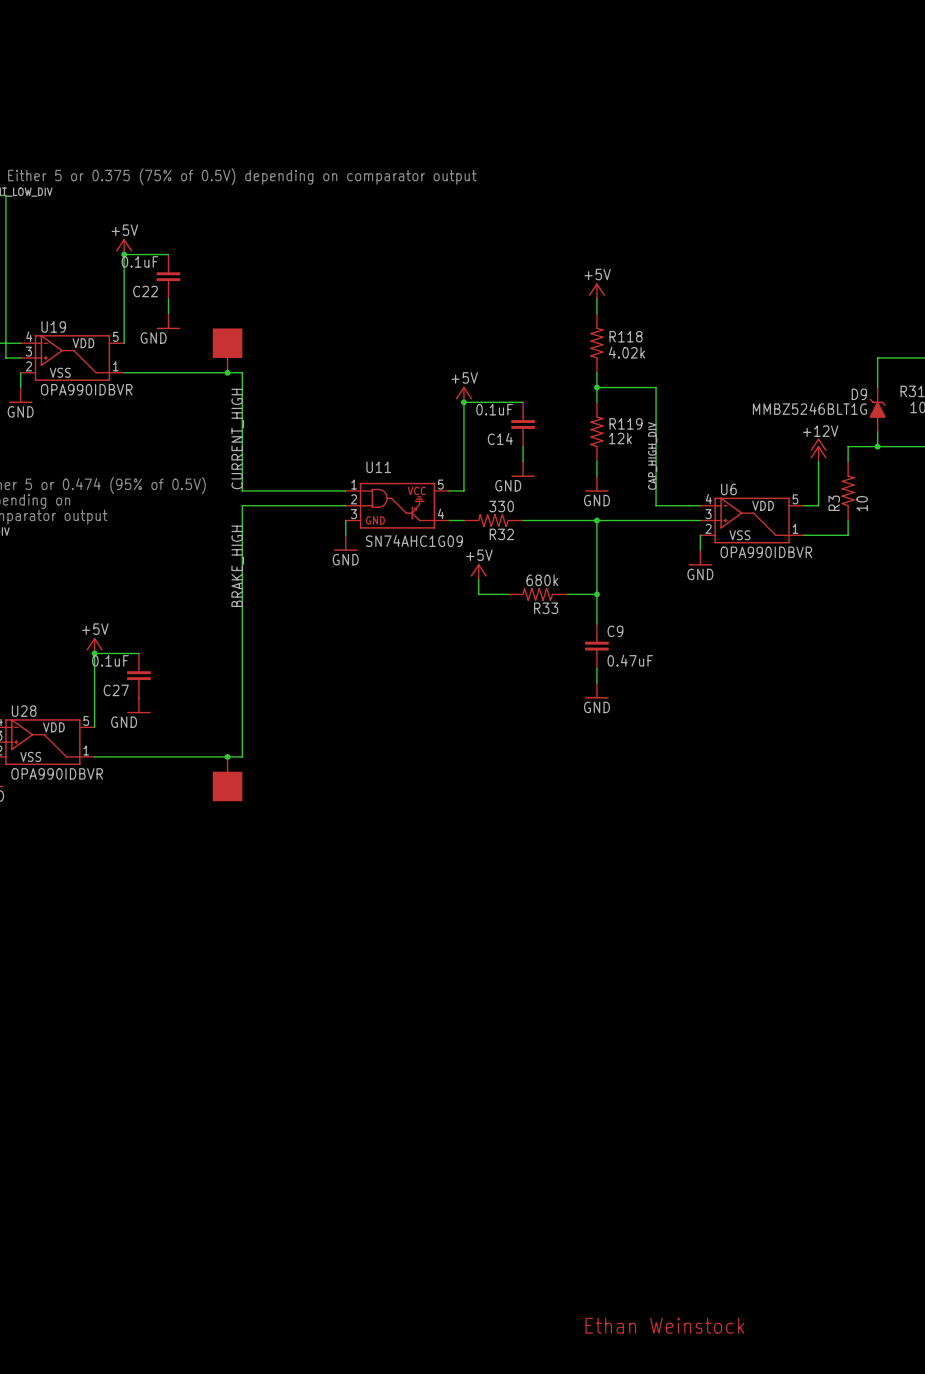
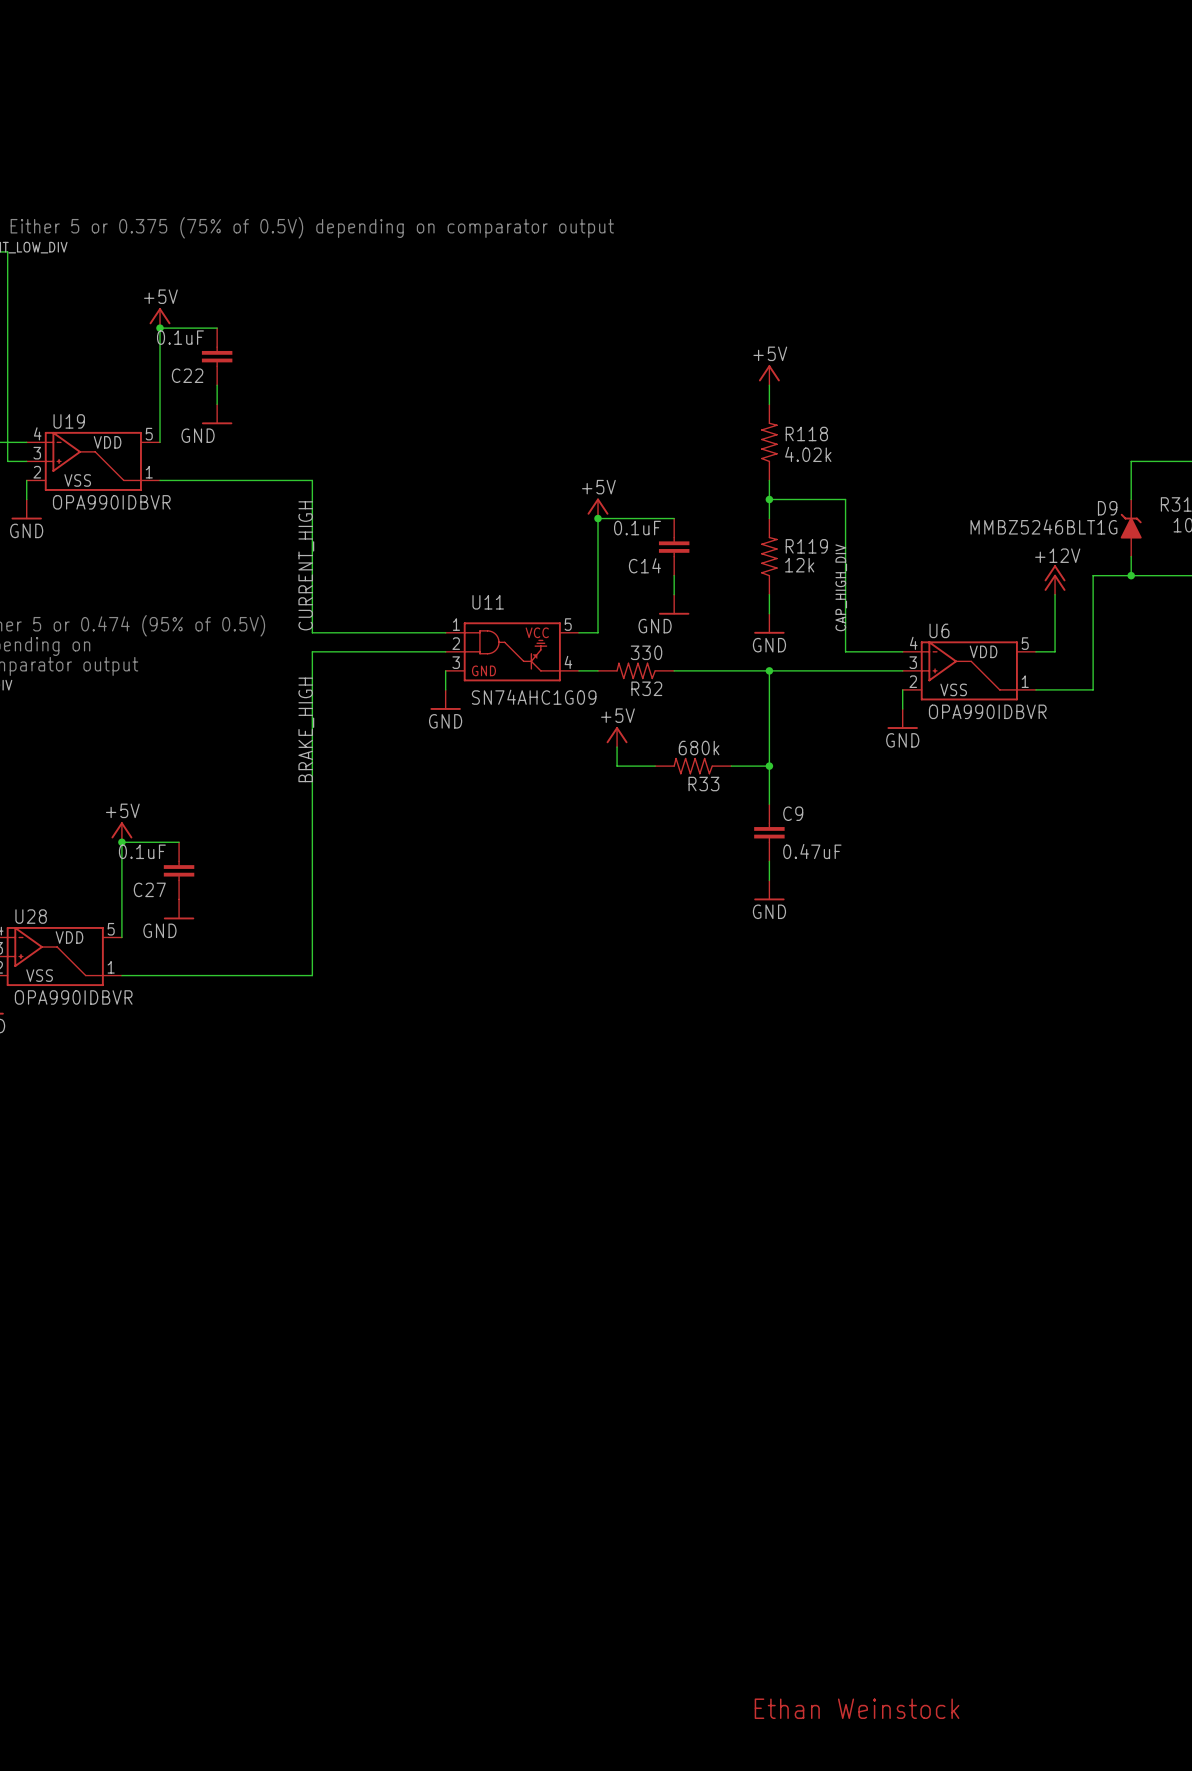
part: (227, 350) -> none
junction: (227, 372) -> none
R3: 10 (848, 490) -> none
junction: (227, 756) -> none
part: (227, 779) -> none

